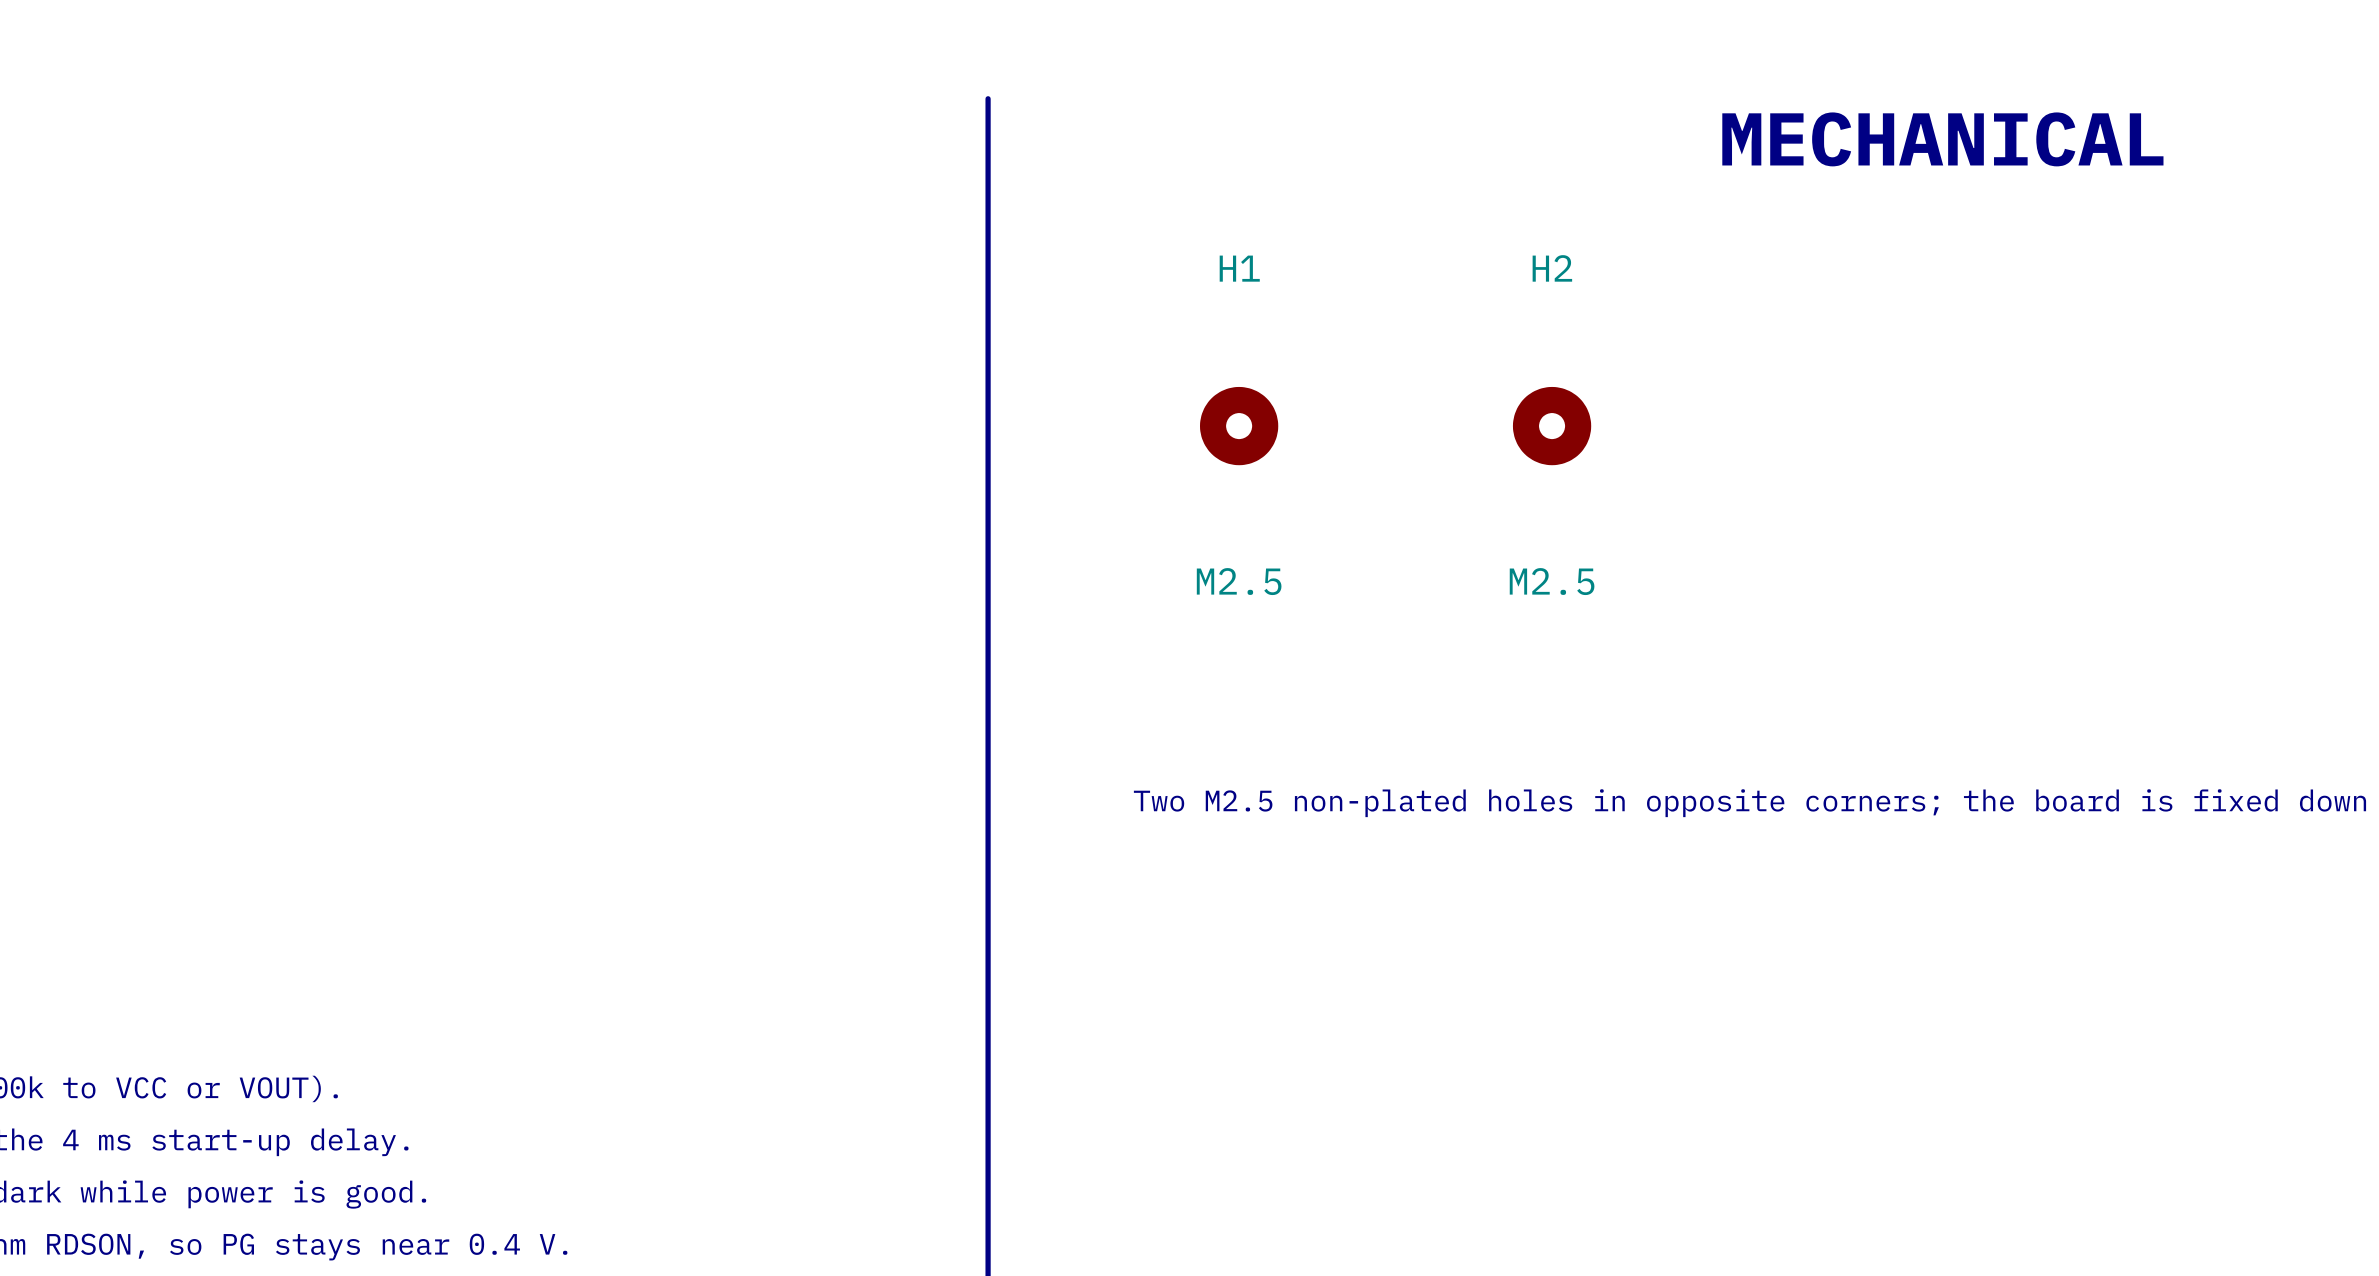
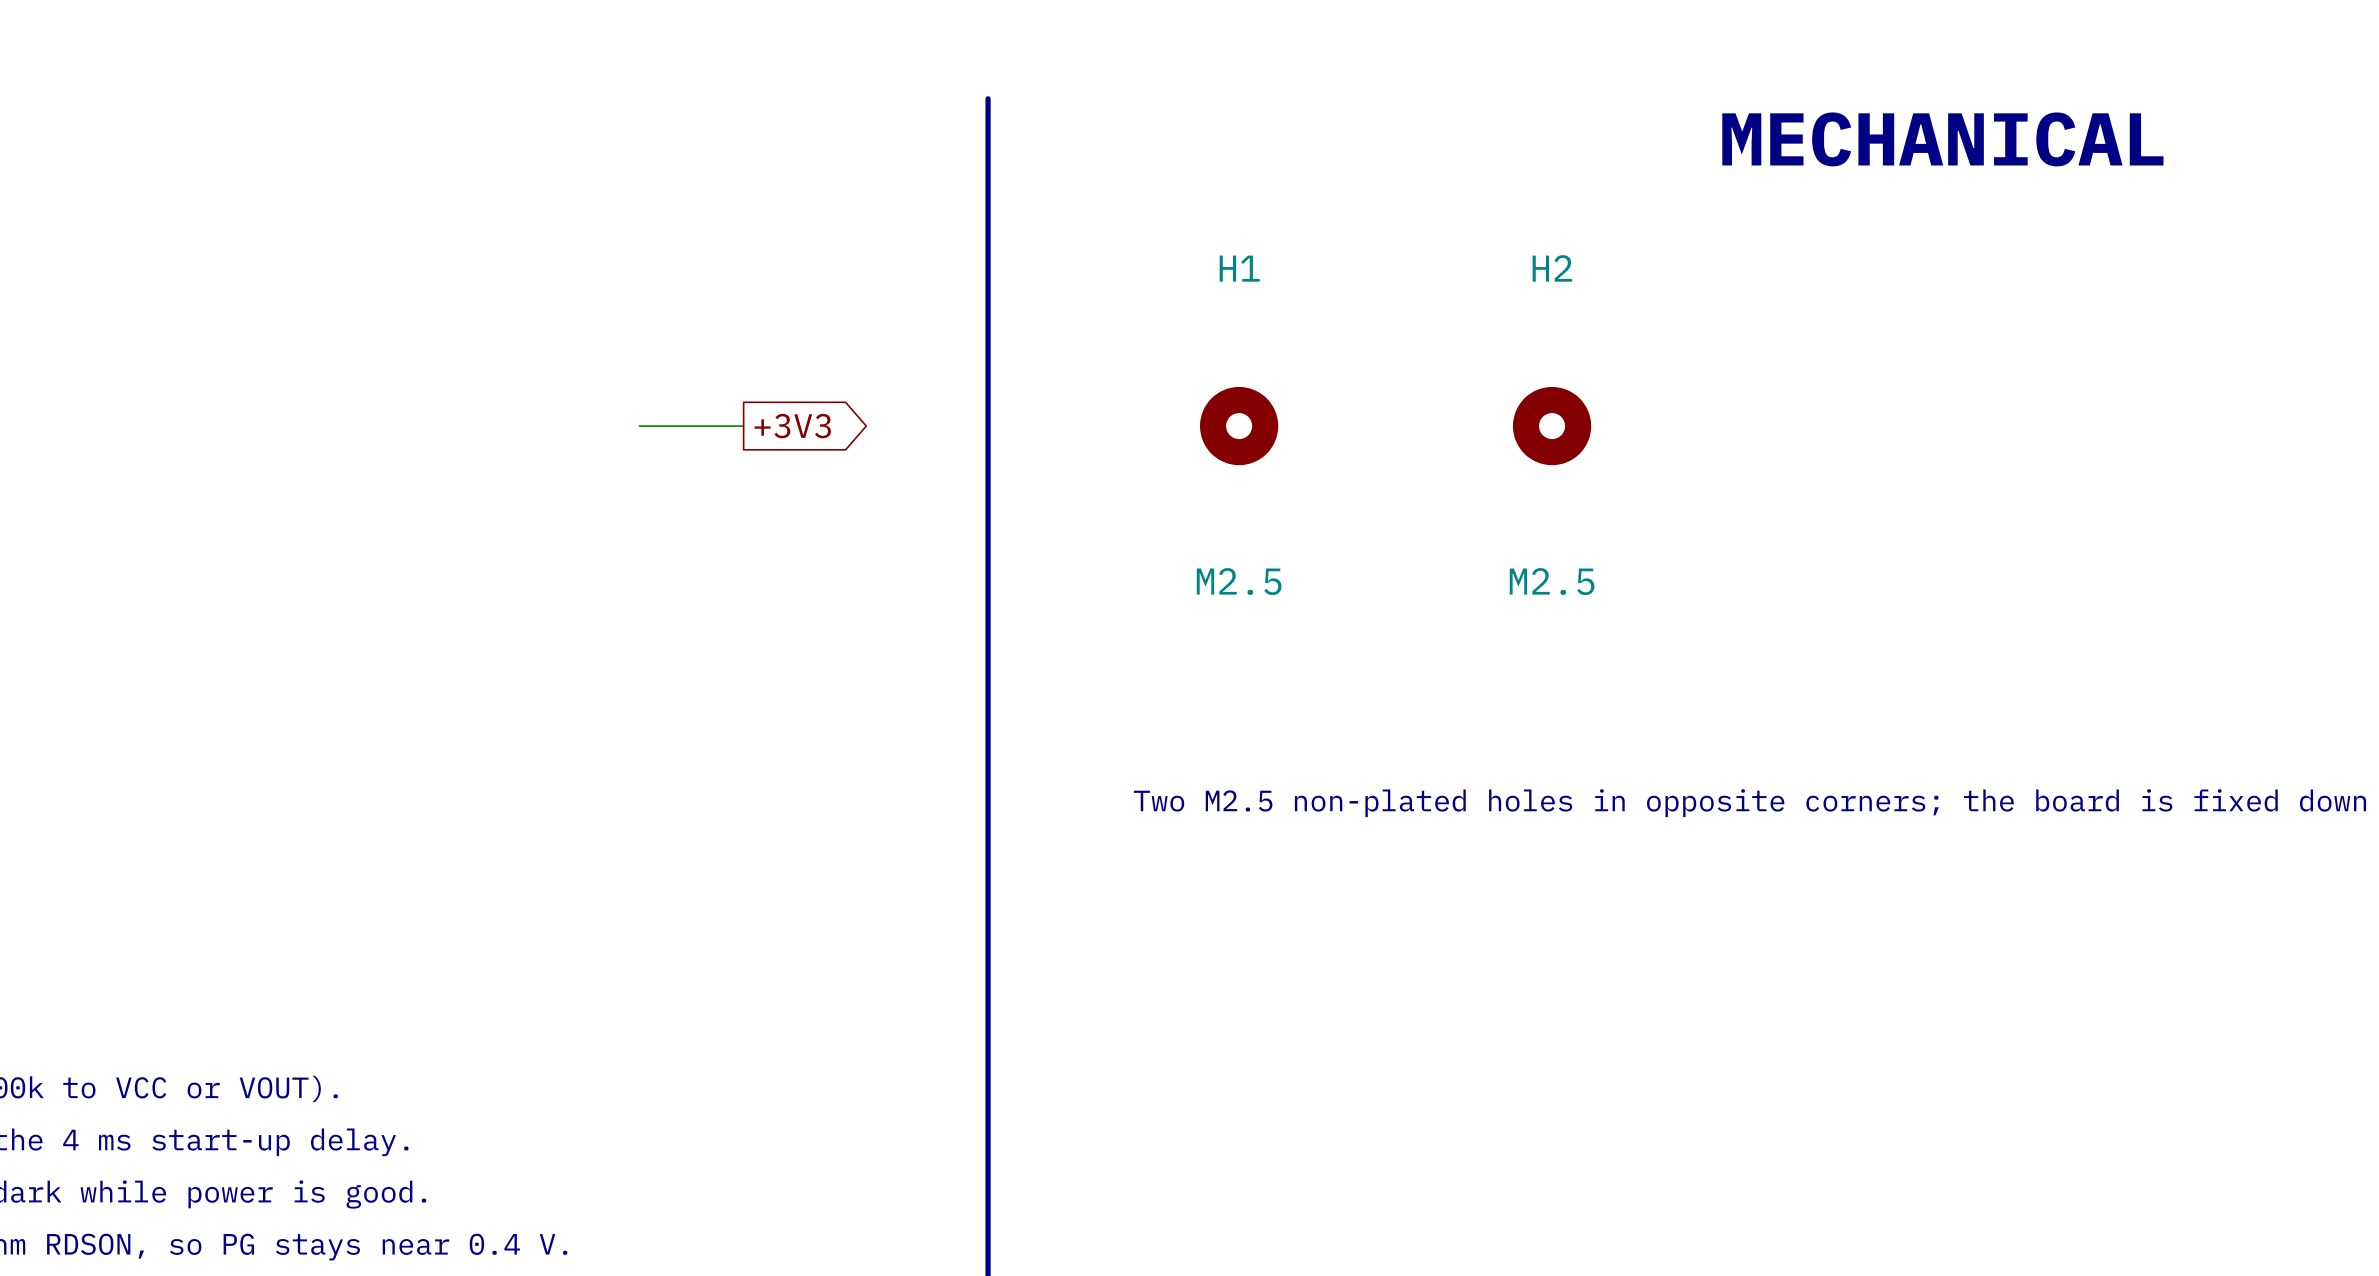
wire: none -> (639, 426) (743, 426)
global label: none -> +3V3 (792, 426)

